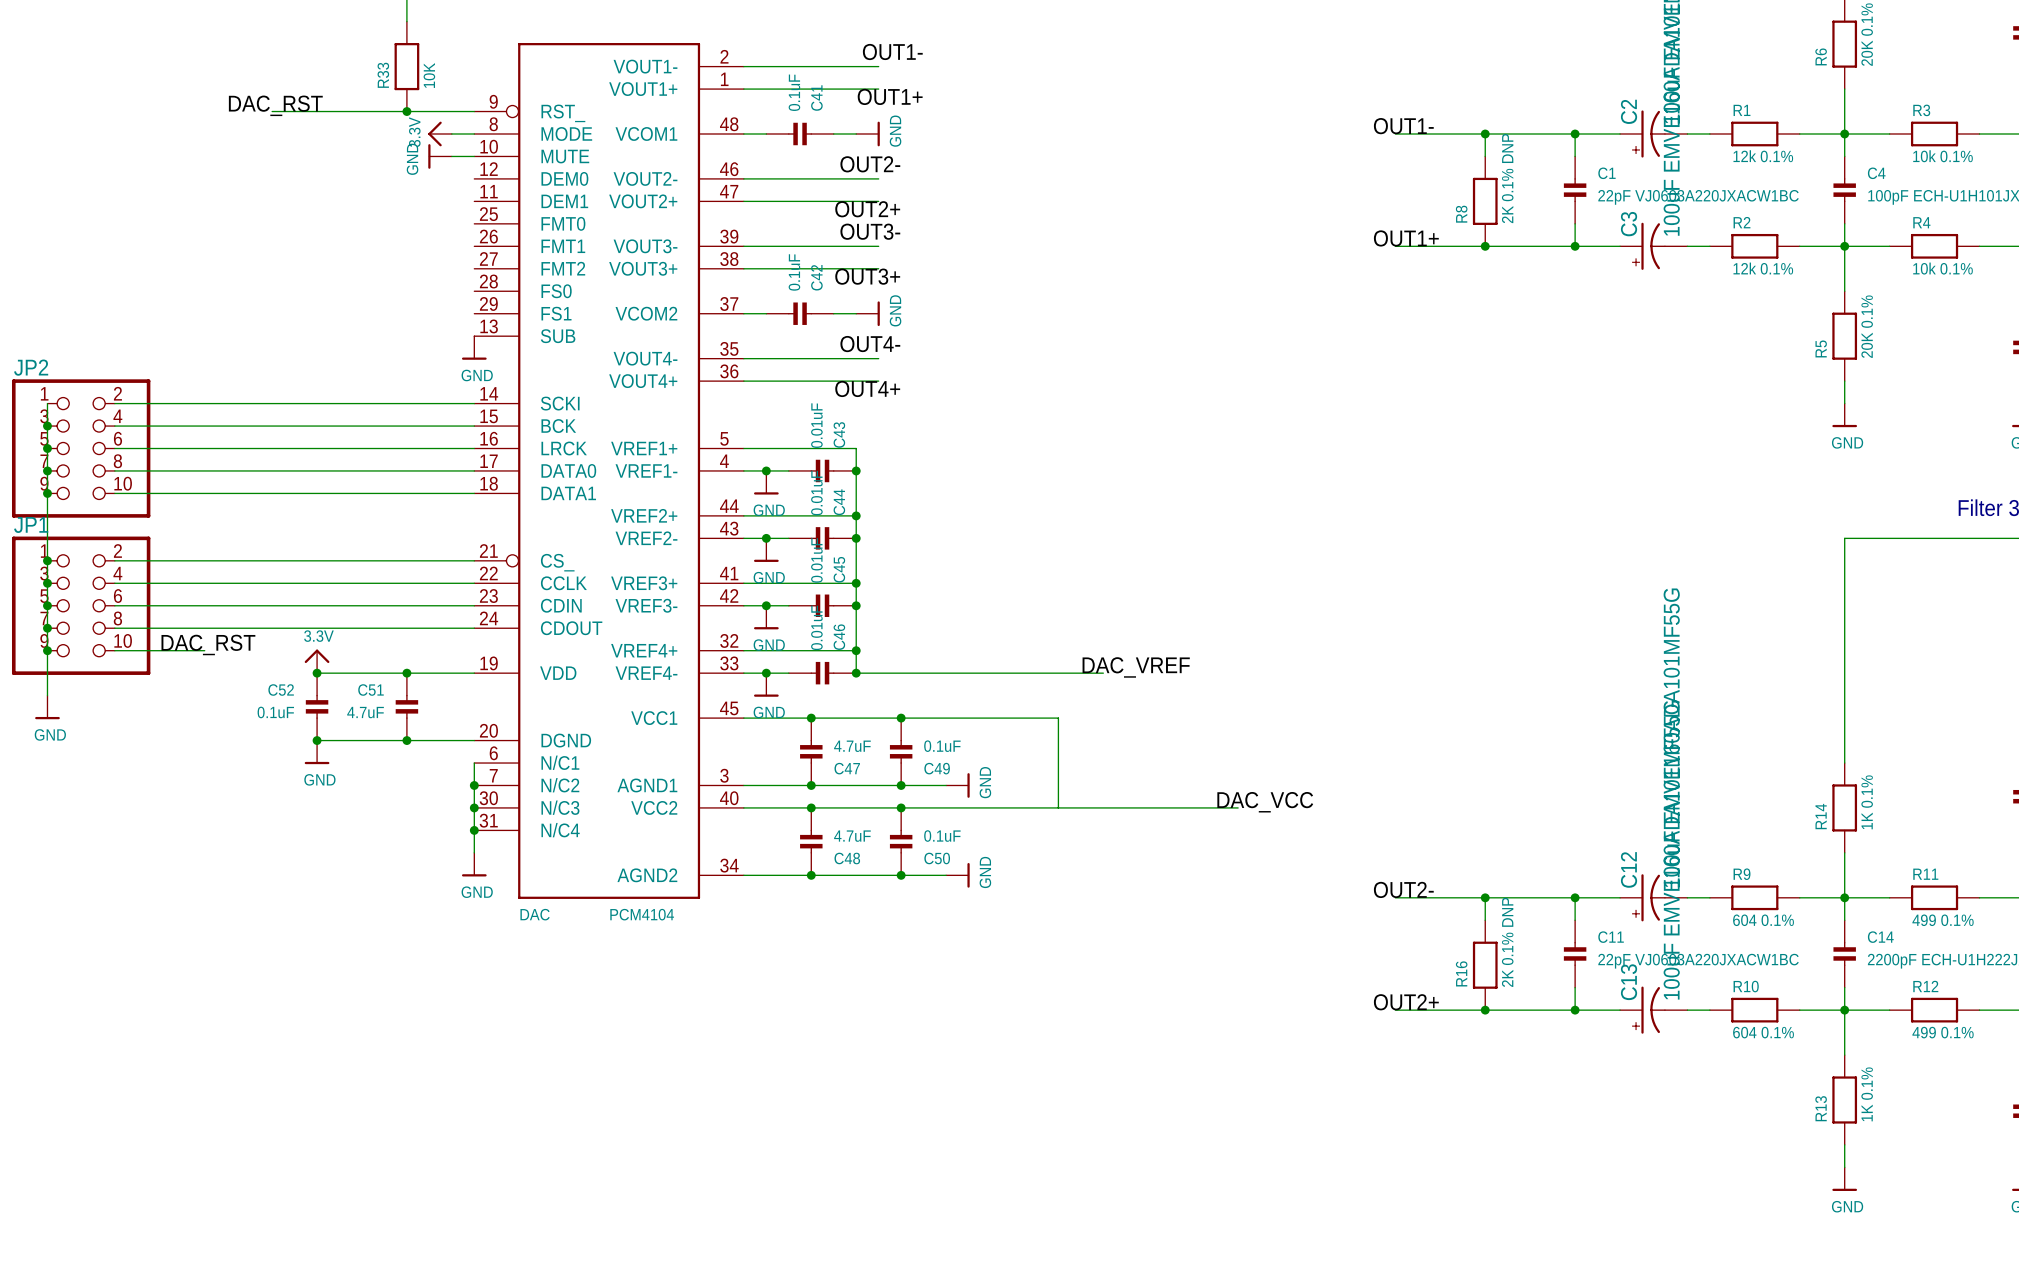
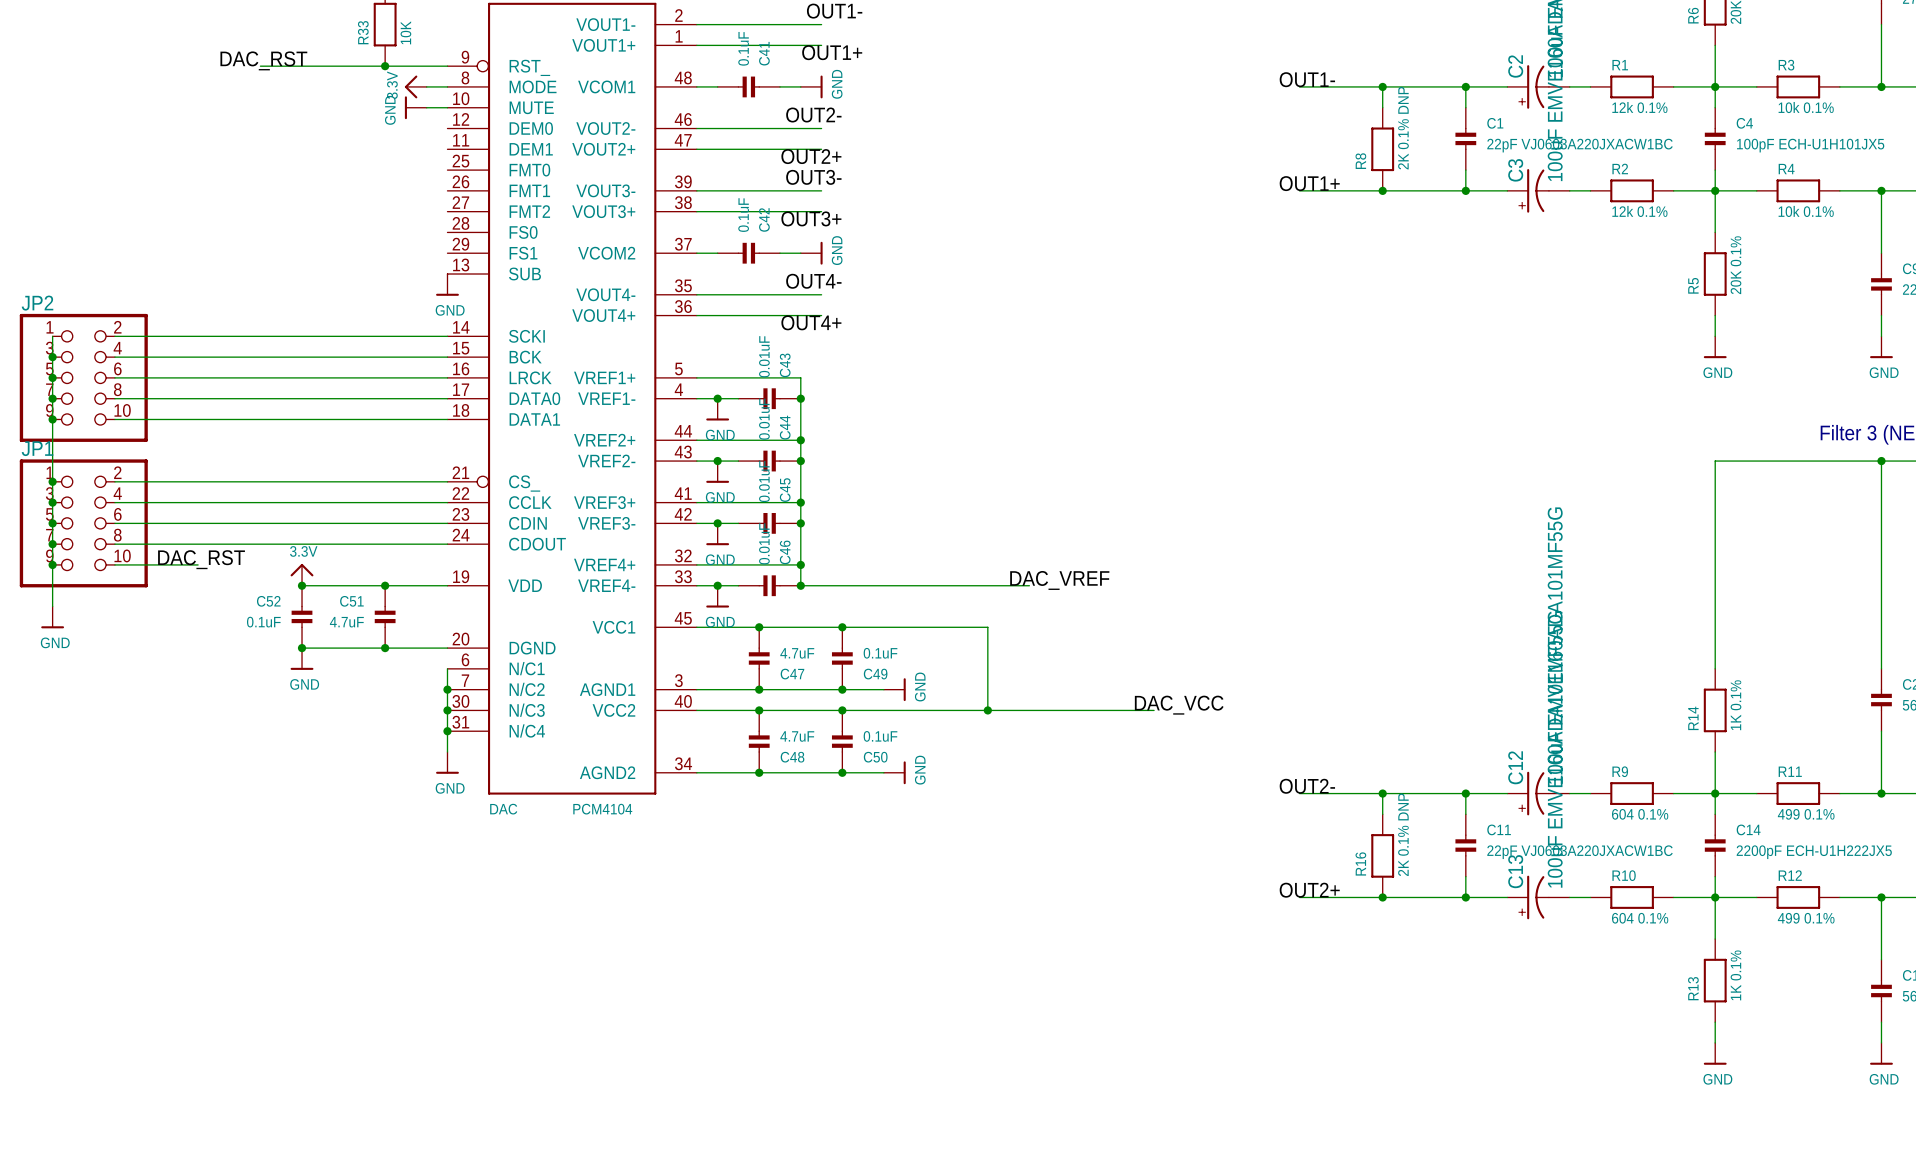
junction: none -> (987, 710)

